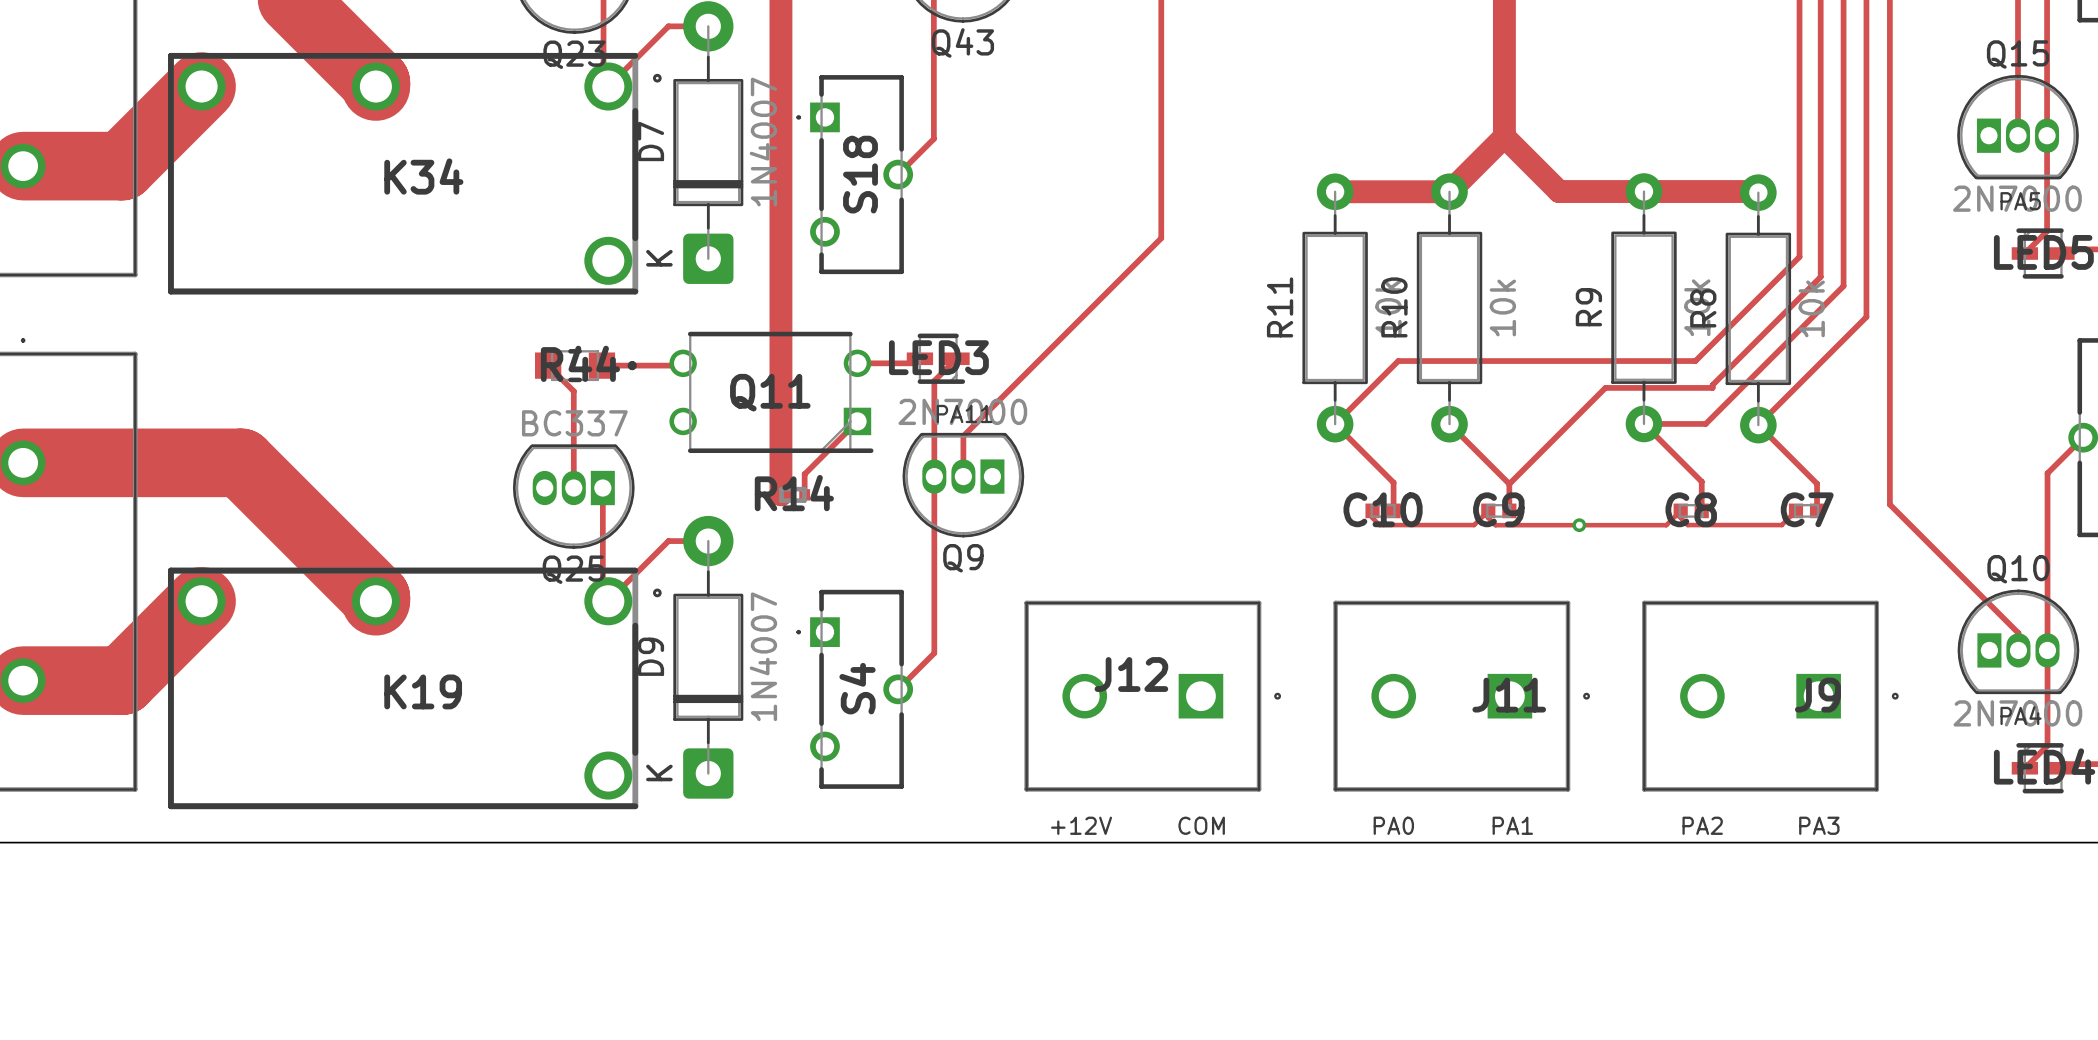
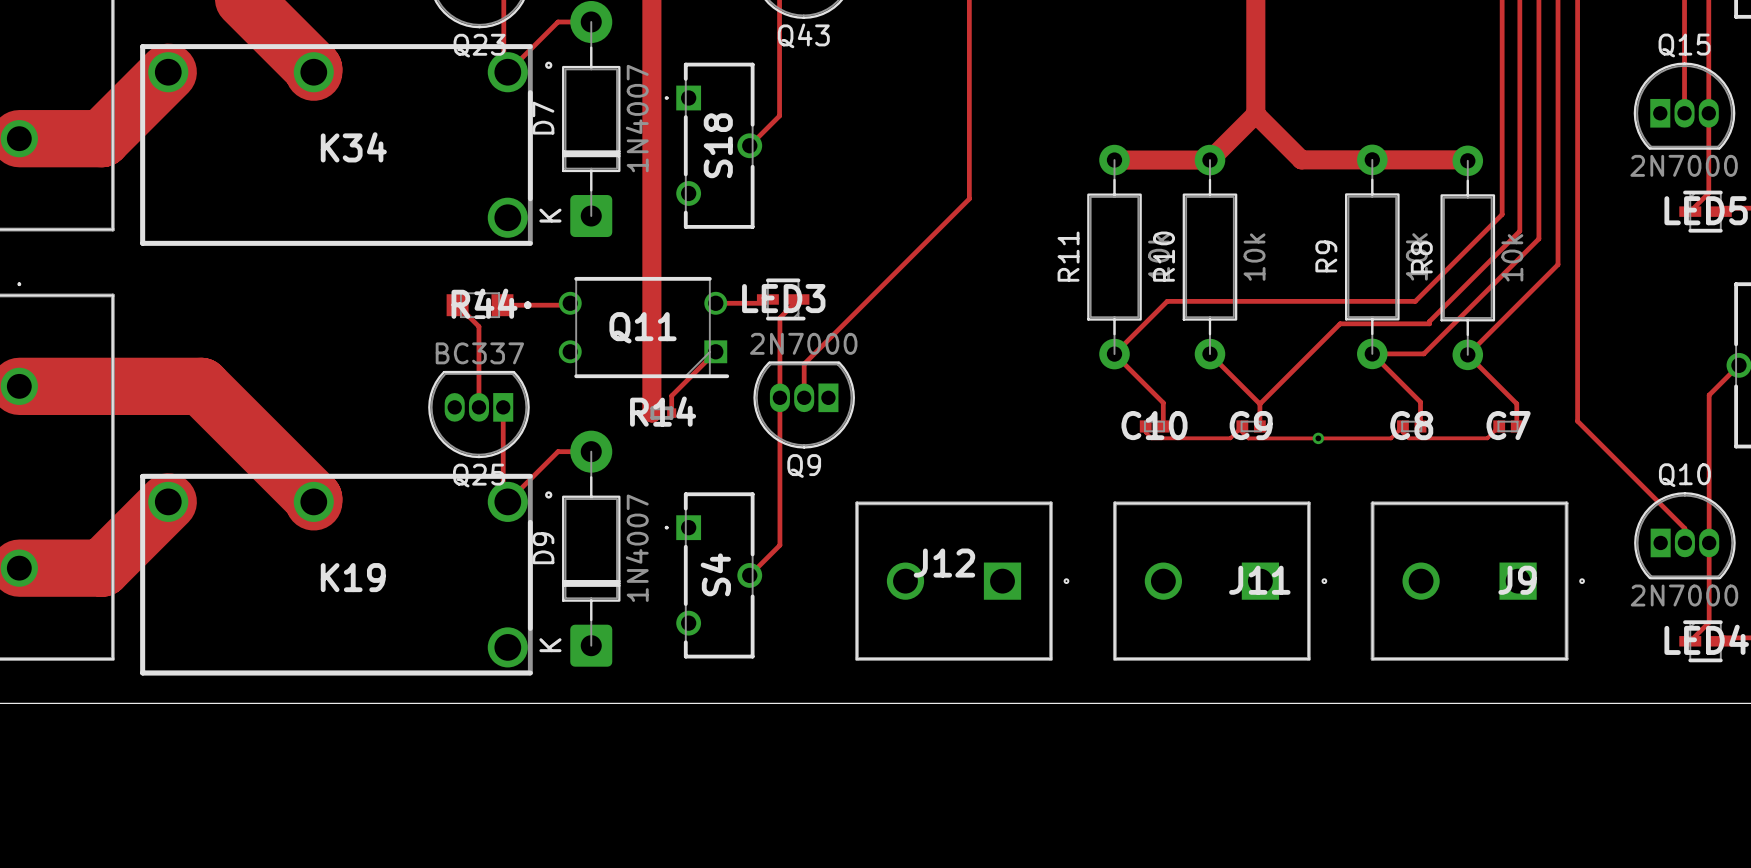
text: PA5 (2020, 201) -> none
text: PA11 (964, 413) -> none
text: PA4 (2021, 715) -> none
text: +12V (1081, 825) -> none
text: COM (1201, 825) -> none
text: PA0 (1393, 825) -> none
text: PA1 (1512, 825) -> none
text: PA2 (1702, 825) -> none
text: PA3 (1819, 825) -> none

